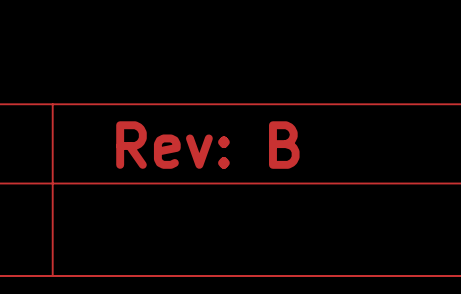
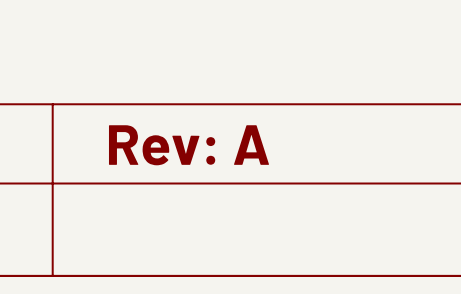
title block: Rev: B (207, 145) -> Rev: A (188, 145)

